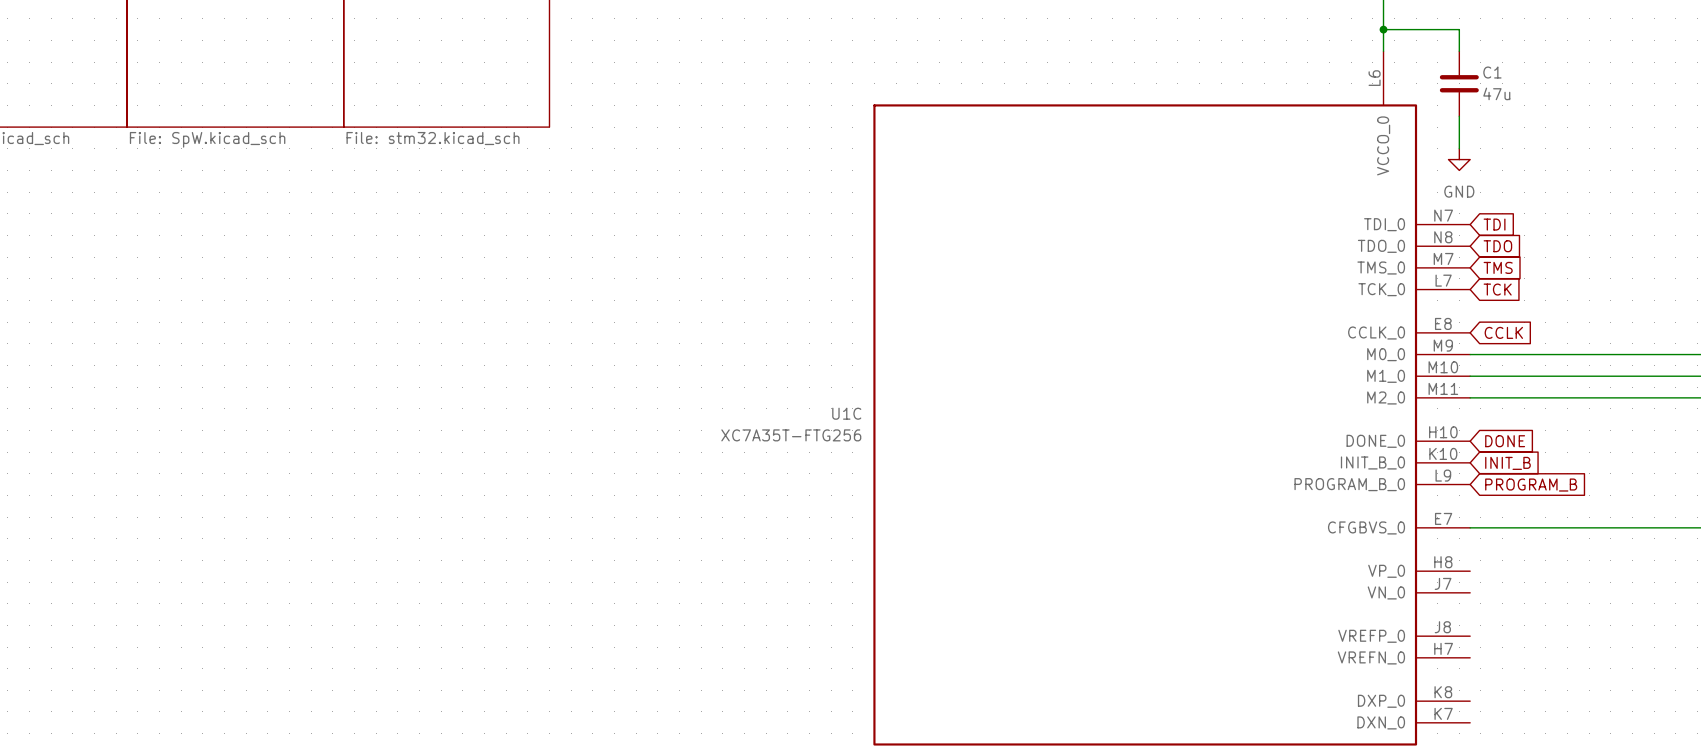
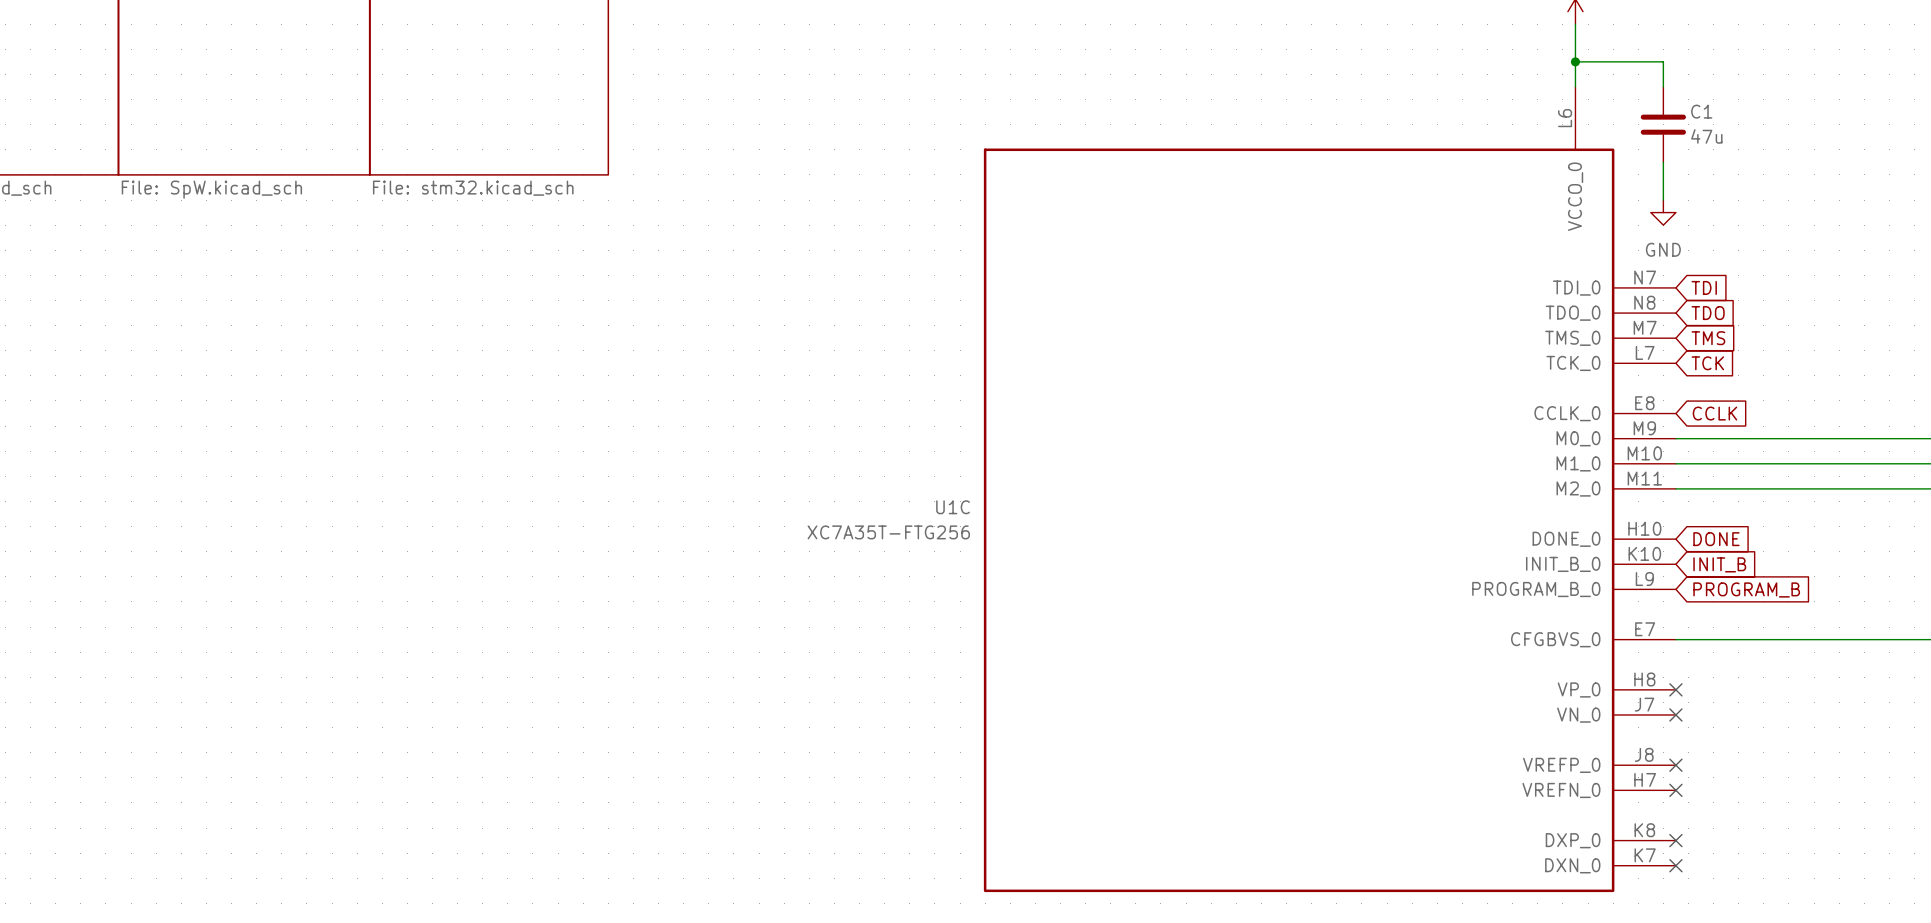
no-connect mark: none -> (1675, 689)
no-connect mark: none -> (1675, 714)
no-connect mark: none -> (1675, 765)
no-connect mark: none -> (1675, 790)
no-connect mark: none -> (1675, 840)
no-connect mark: none -> (1675, 865)

